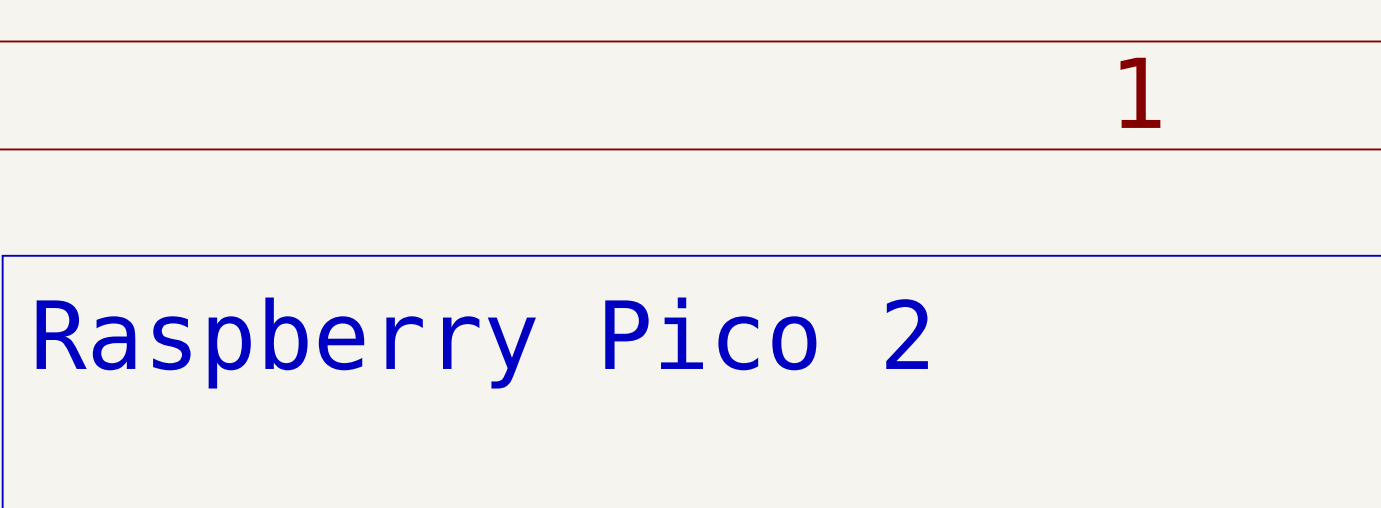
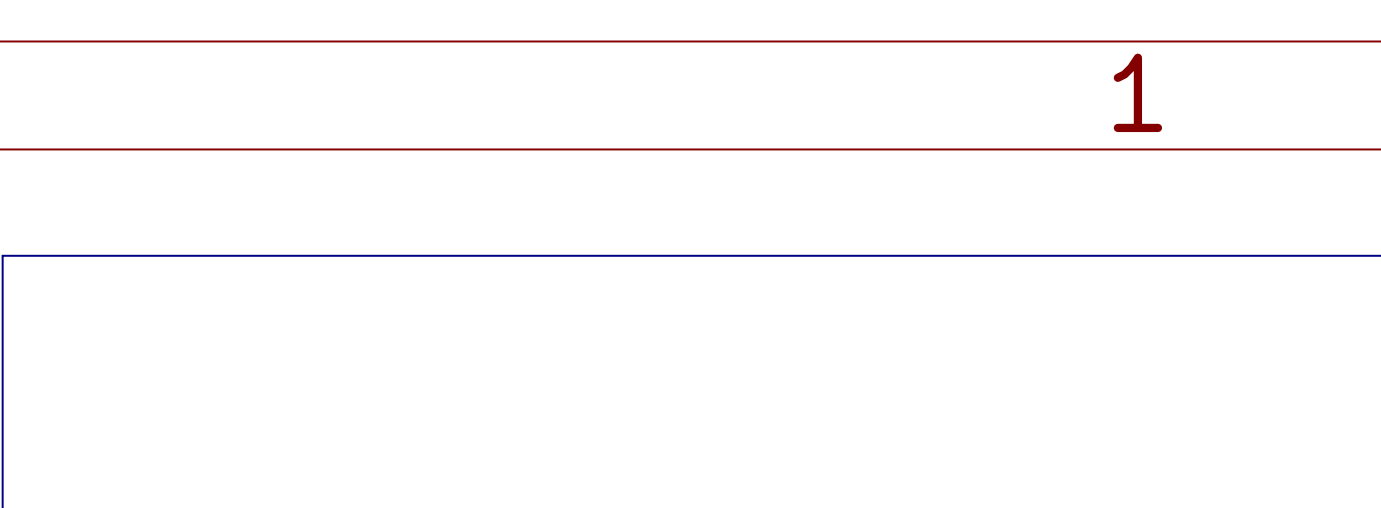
text: Raspberry Pico 2 (482, 343) -> none

